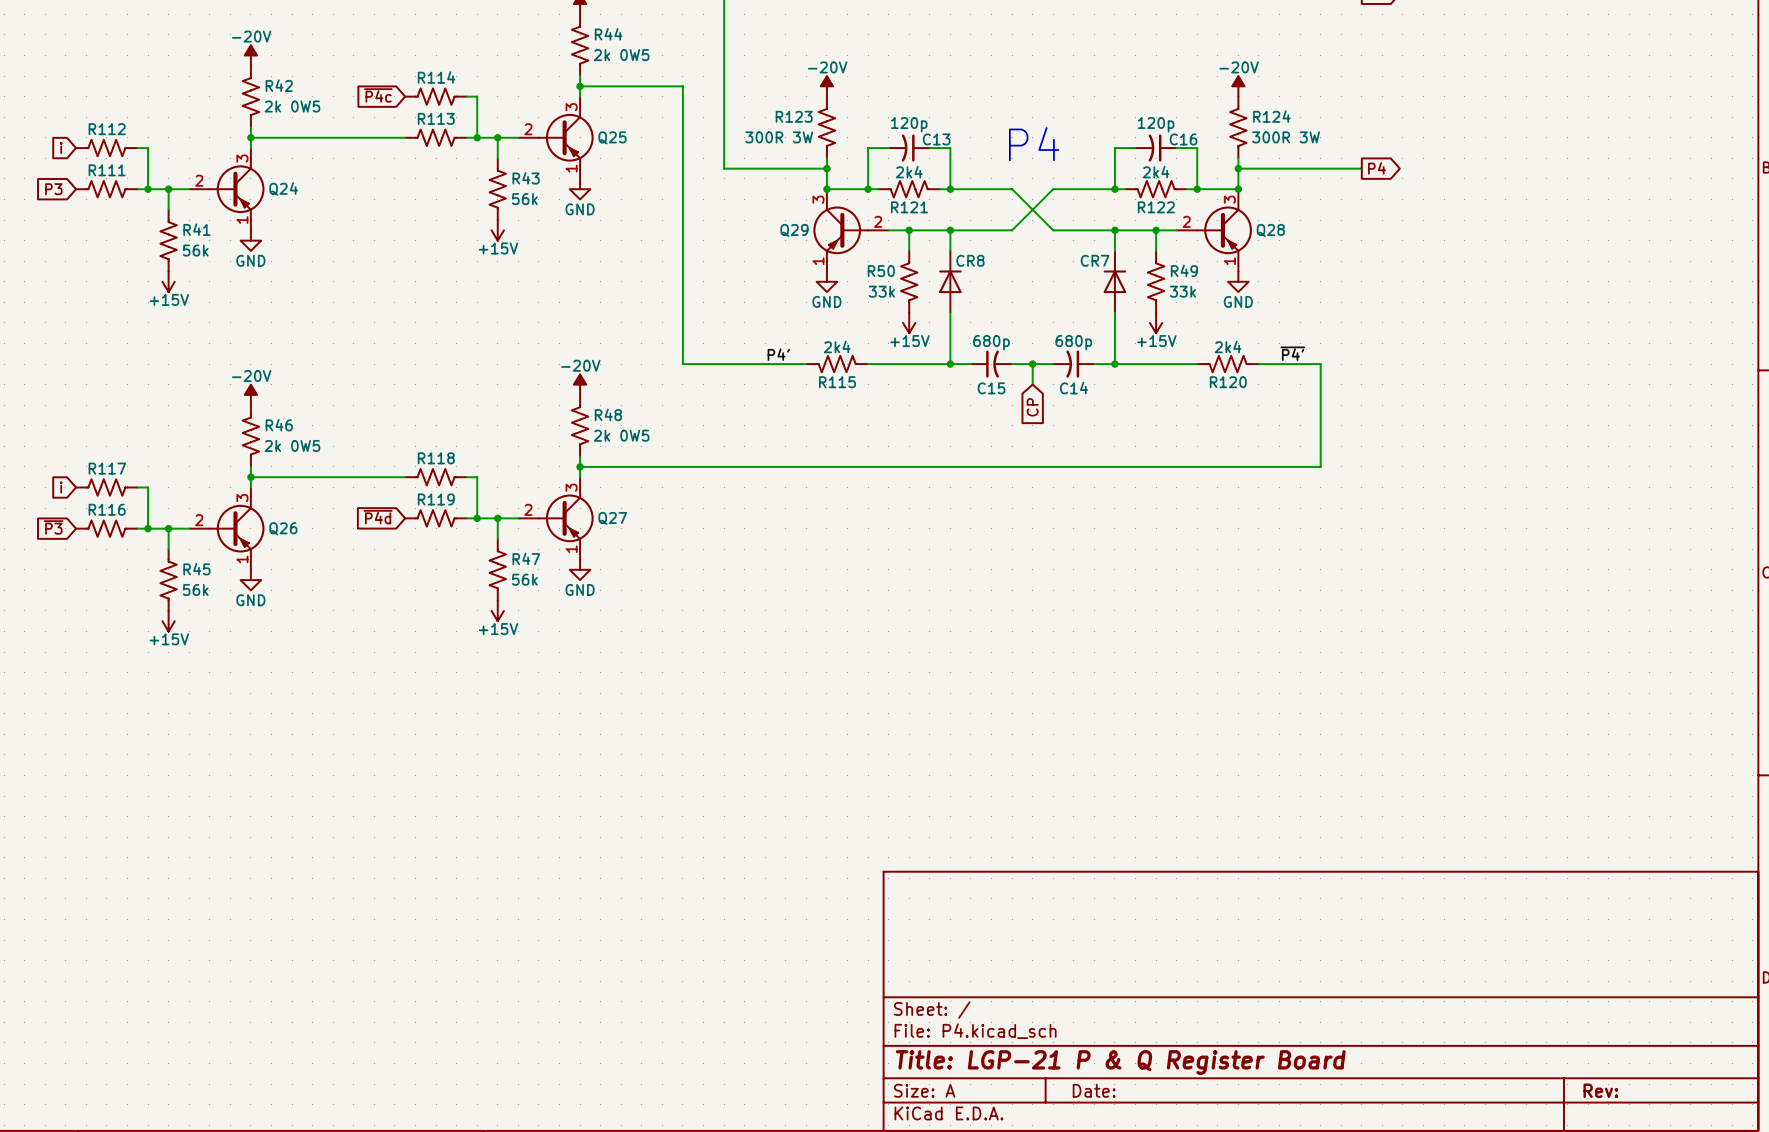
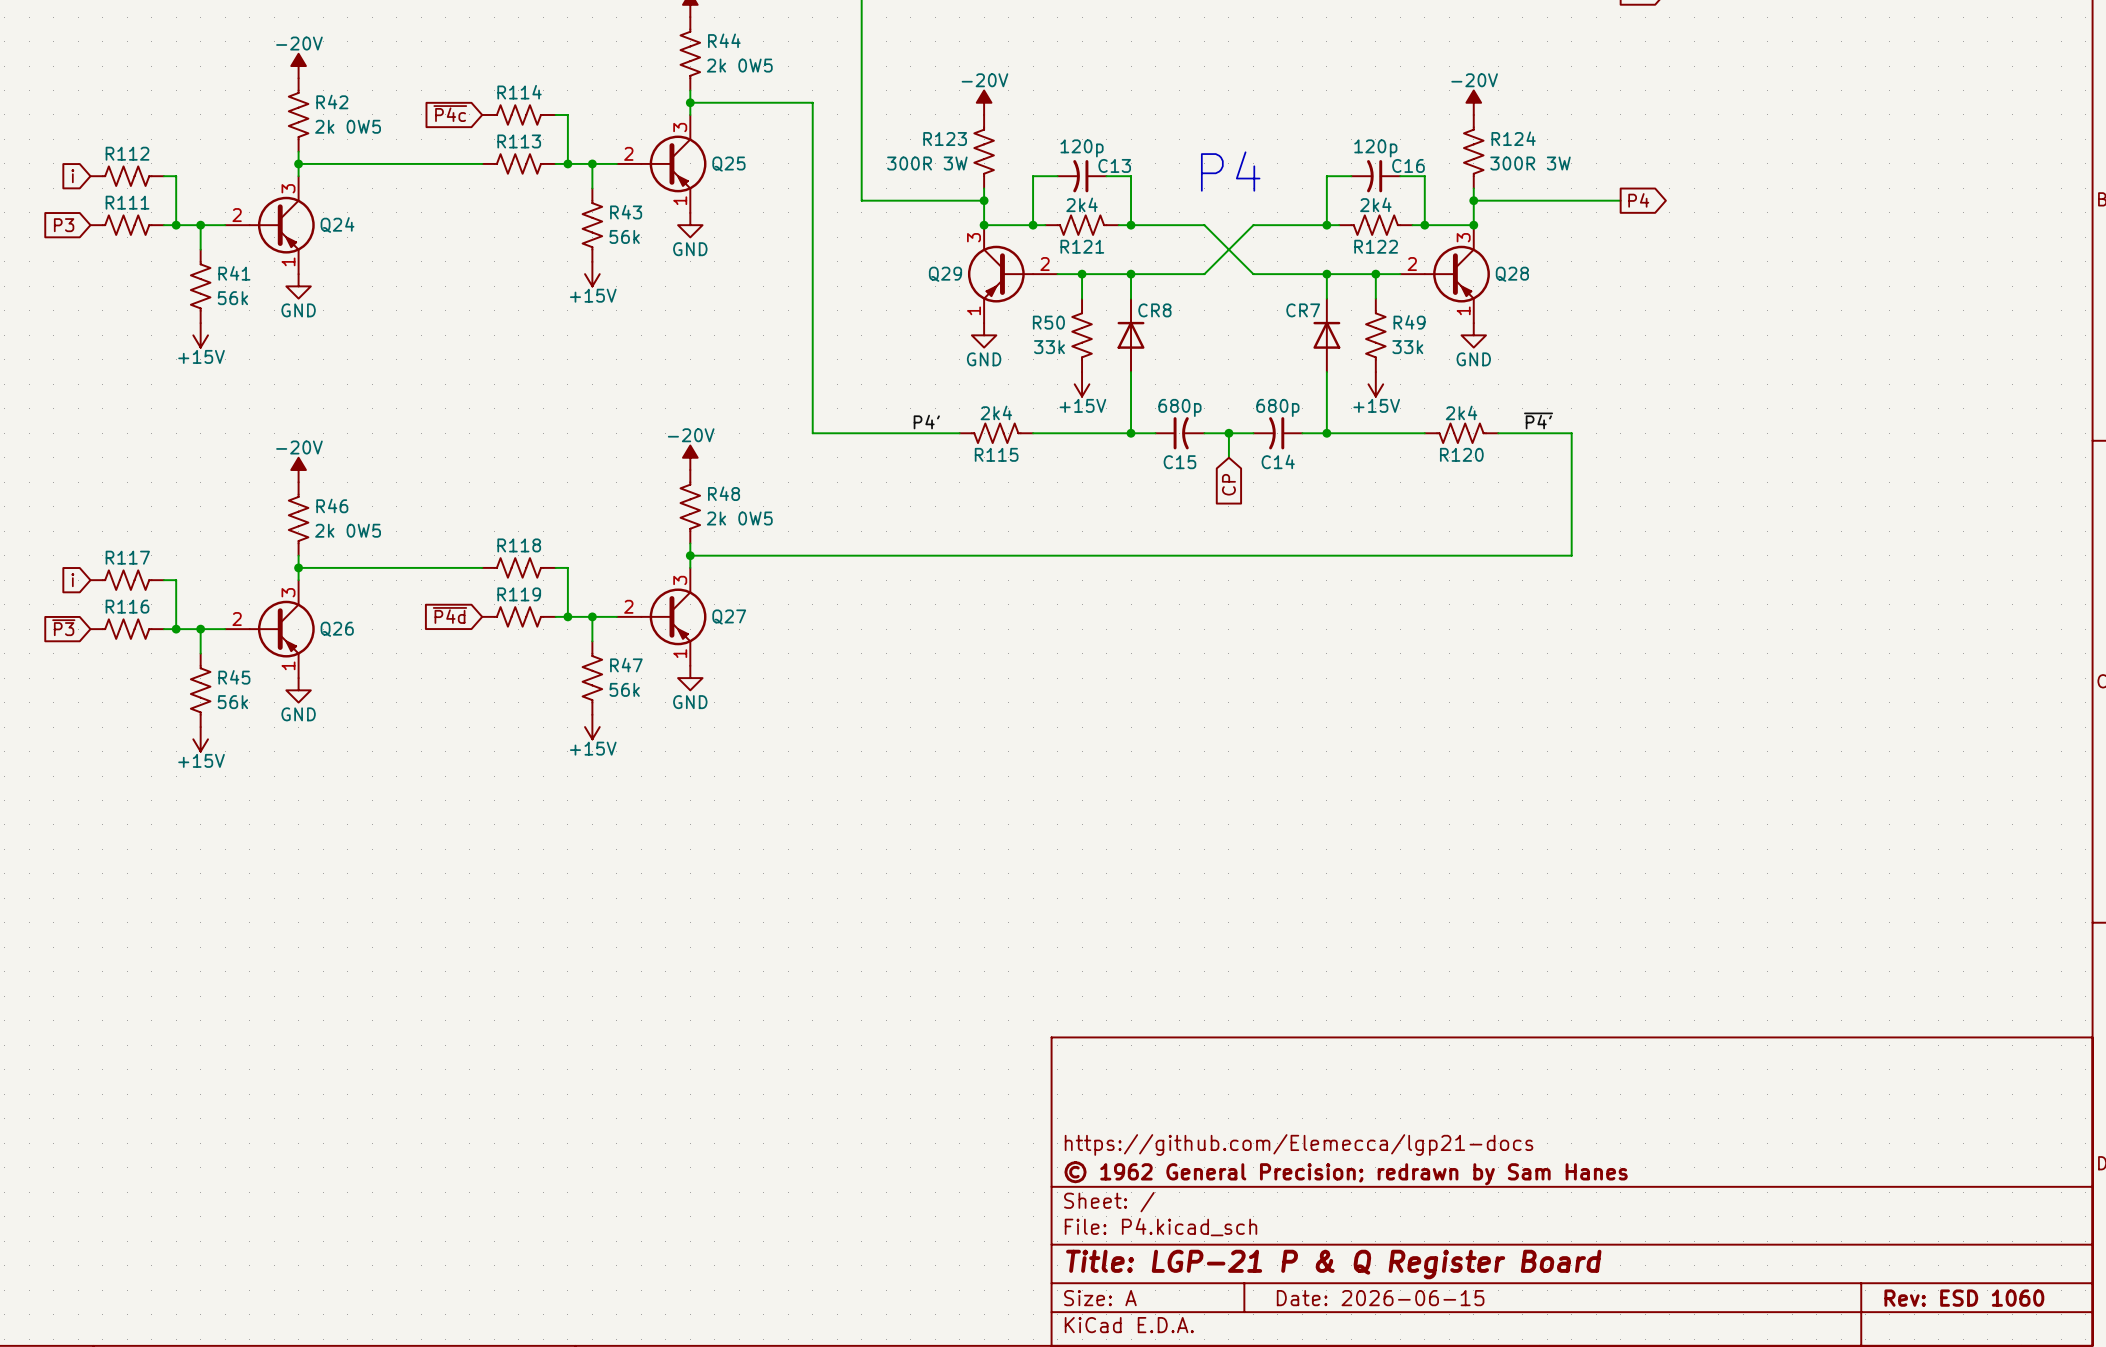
title block: none -> https://github.com/Elemecca/lgp21-docs (1299, 1144)
title block: none -> © 1962 General Precision; redrawn by Sam Hanes (1346, 1173)
title block: Date: (1094, 1090) -> Date: 2026-06-15 (1380, 1298)
title block: Rev: (1600, 1090) -> Rev: ESD 1060 (1964, 1298)

